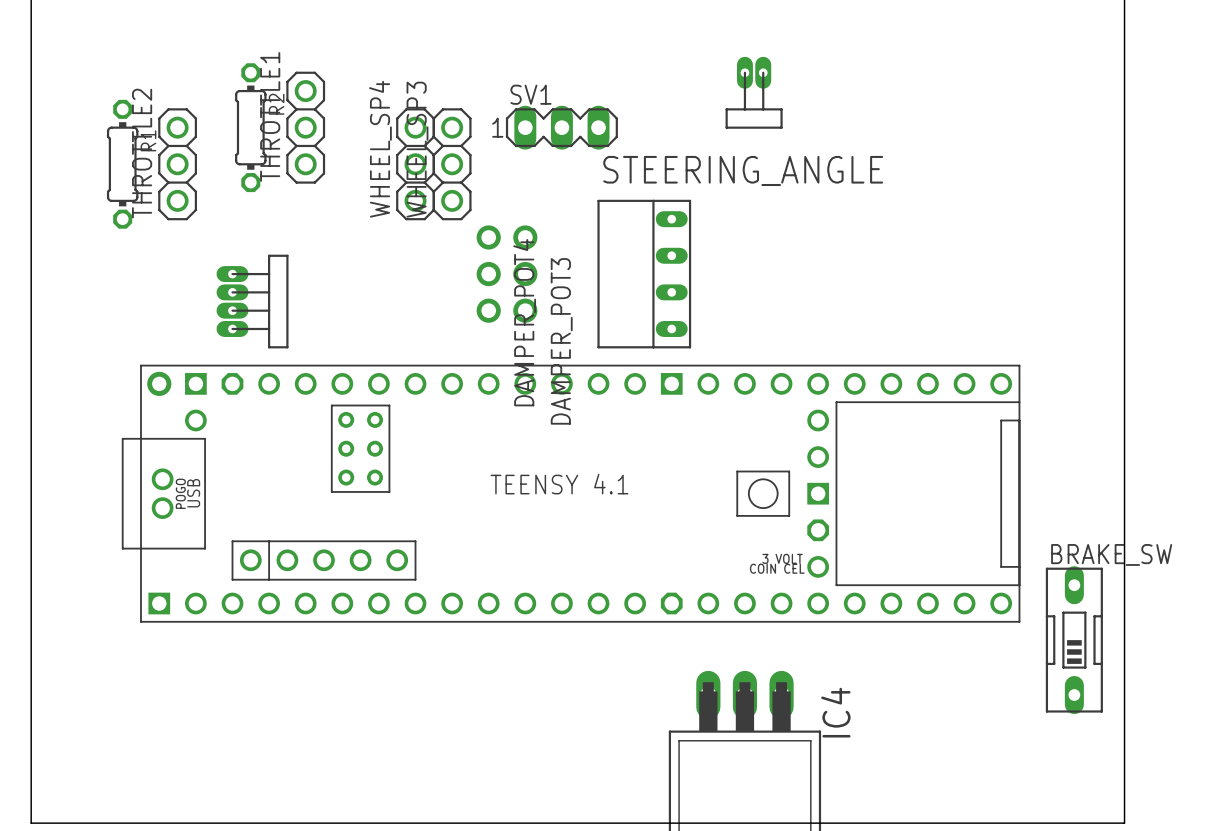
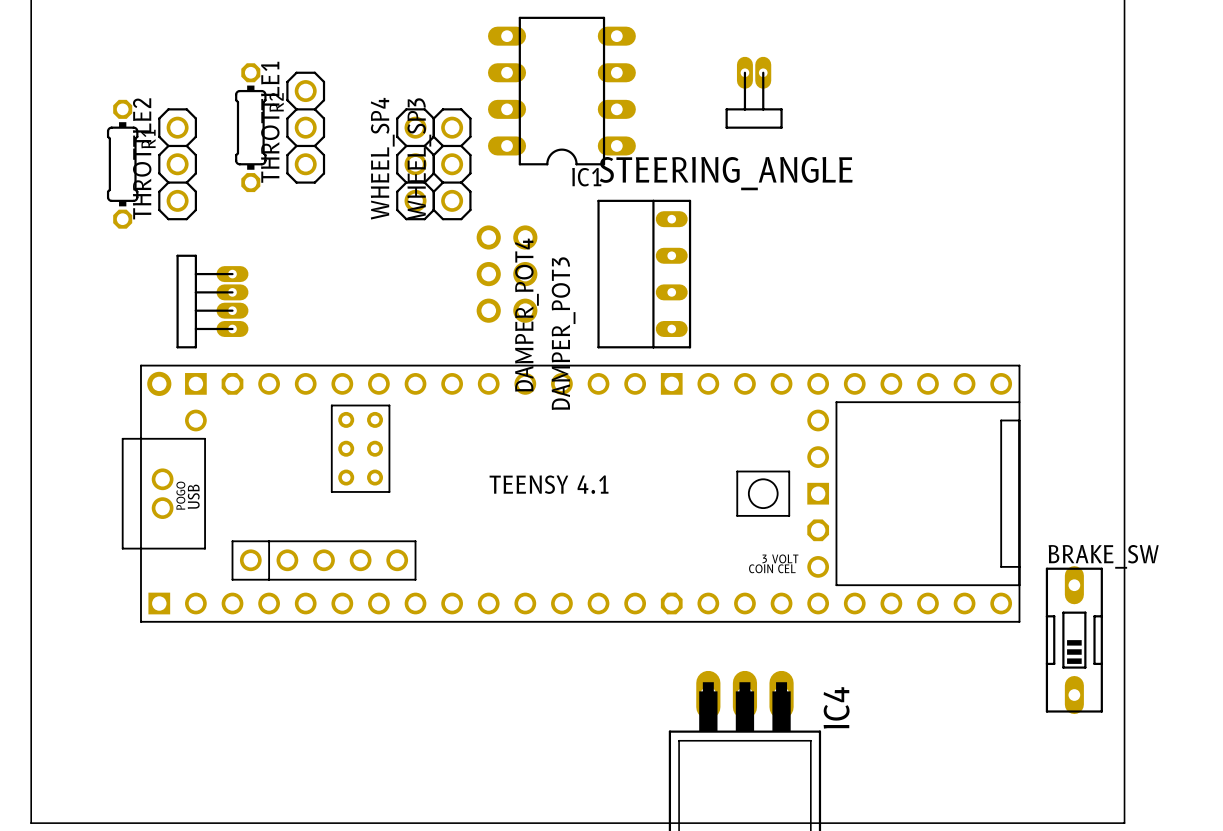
IC1: none -> (561, 91)
SV1: (561, 127) -> none
part rotation: 0° (252, 301) -> 180° (212, 301)

